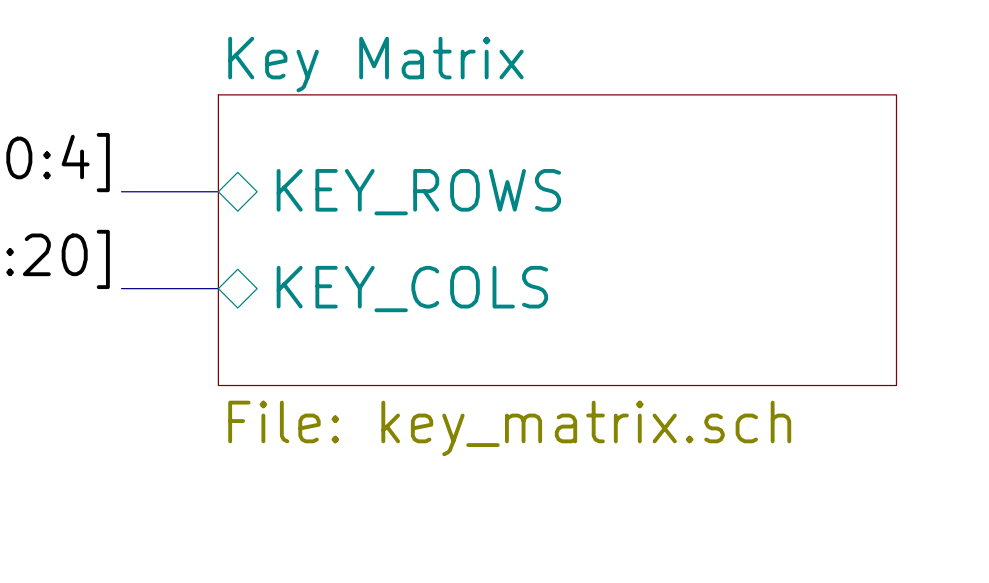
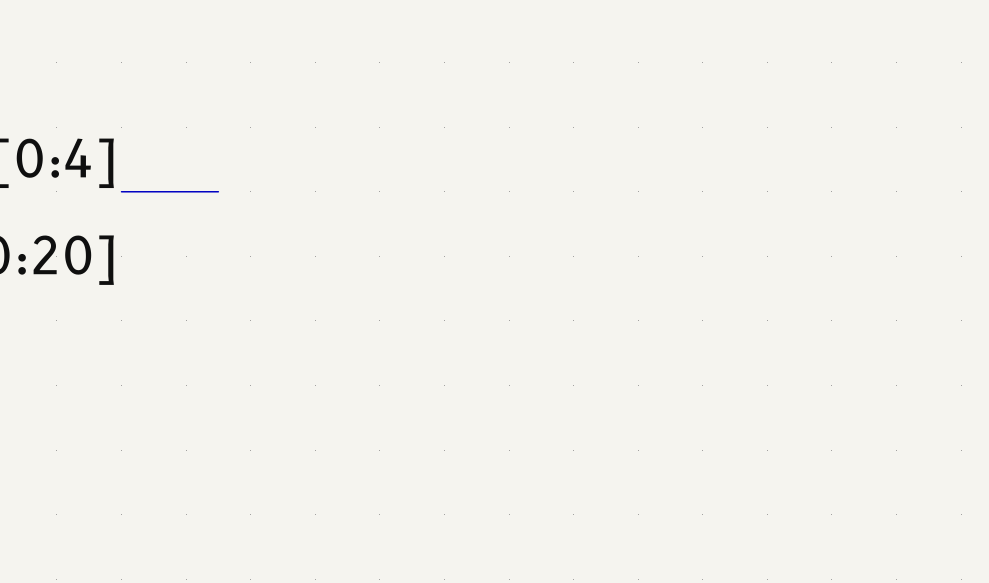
sheet pin: KEY_ROWS (418, 192) -> none
sheet Key Matrix: File: key_matrix.sch (557, 240) -> none
bus: (121, 288) (218, 288) -> none
sheet pin: KEY_COLS (412, 289) -> none

